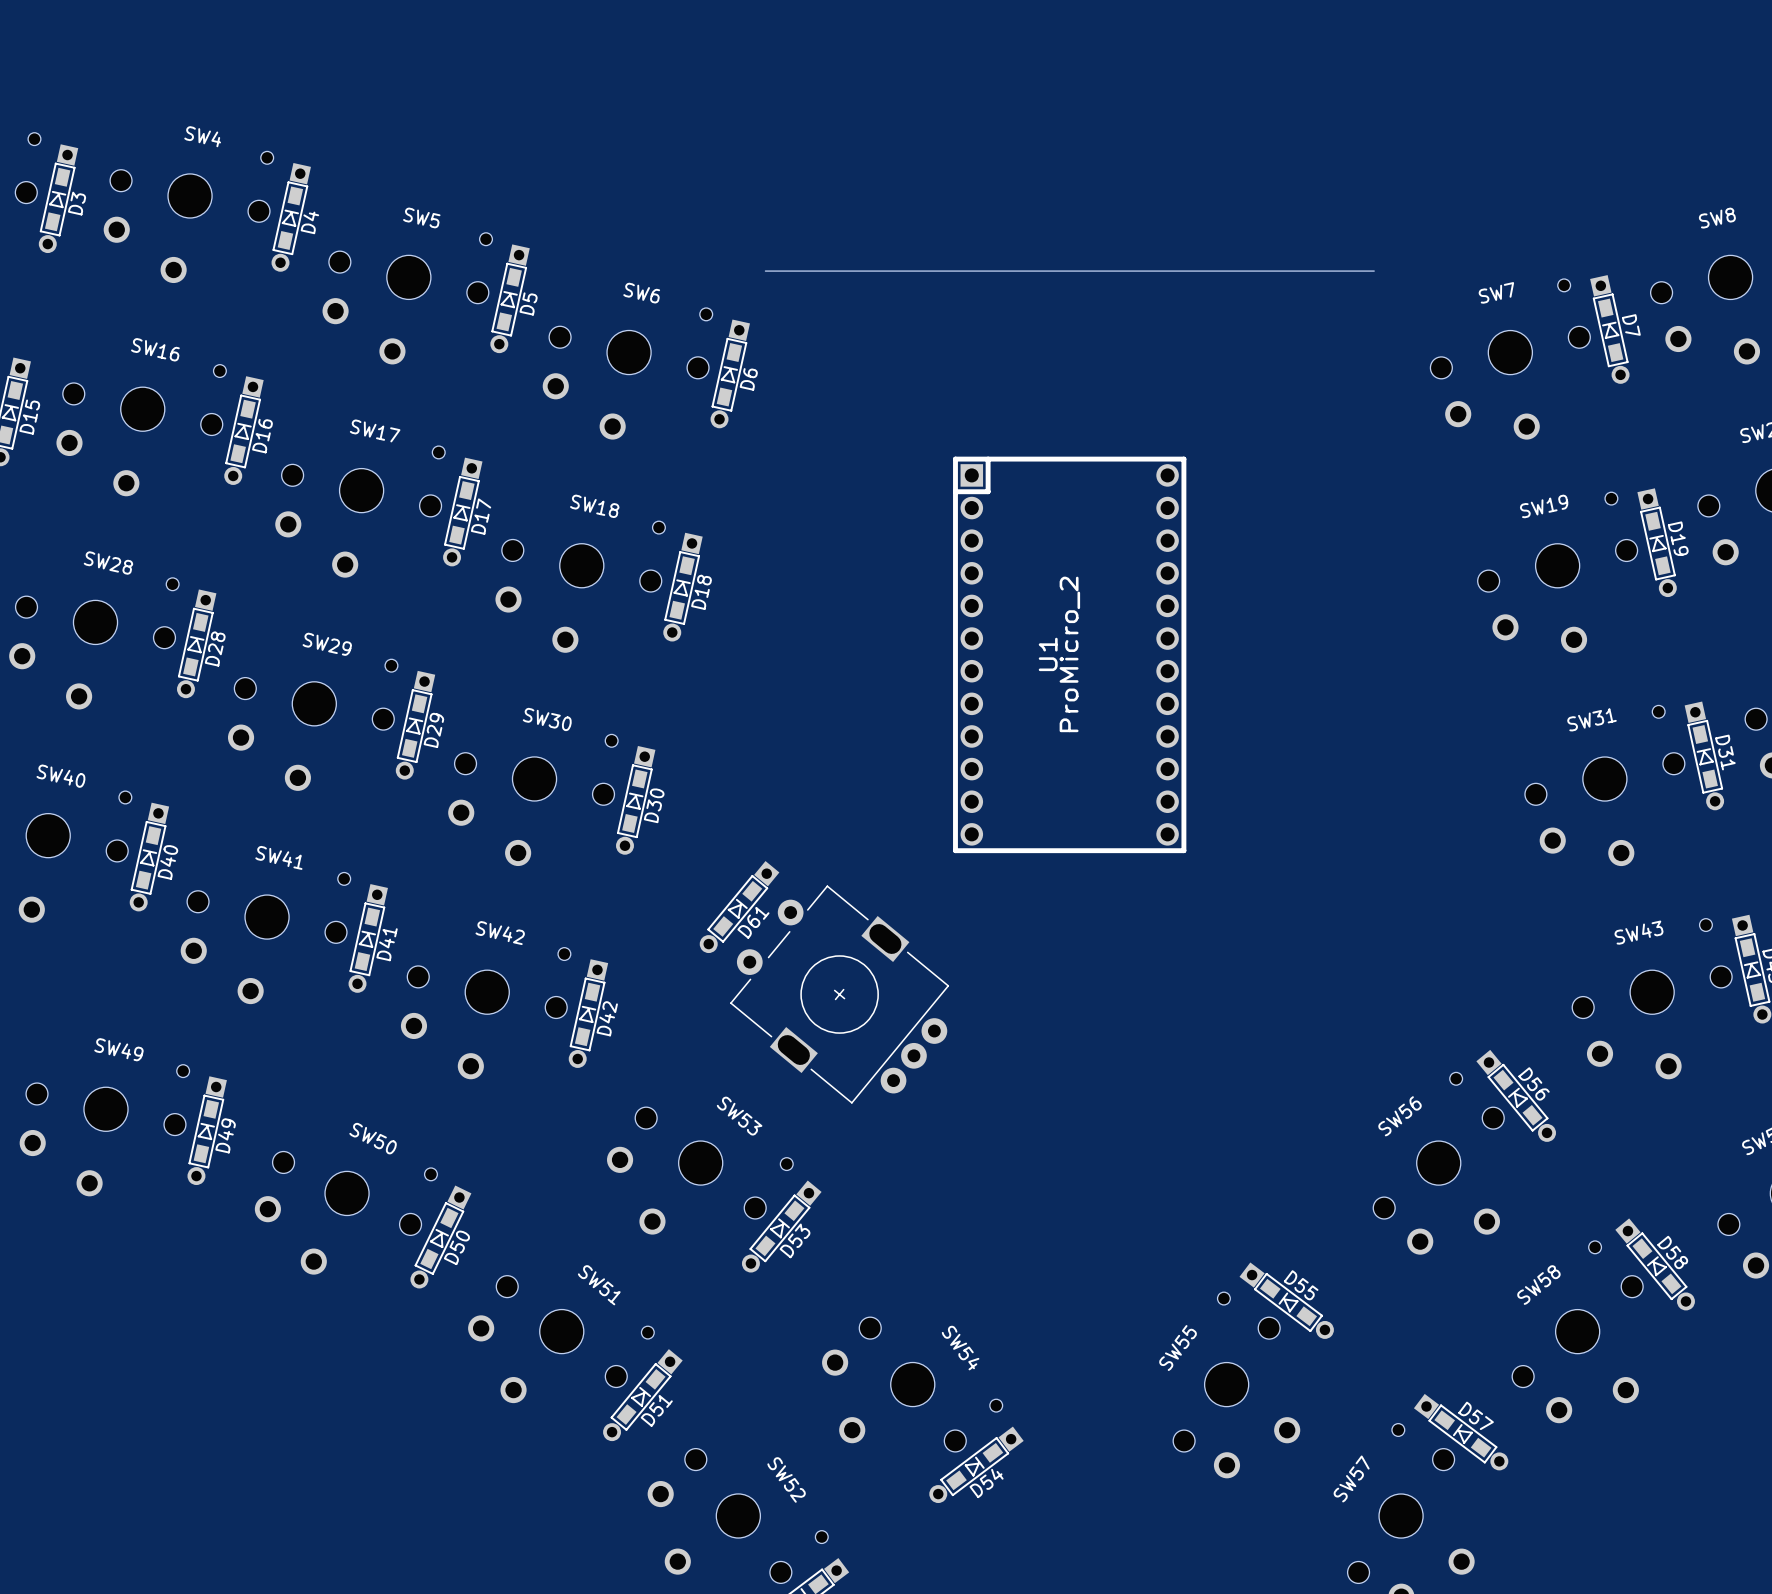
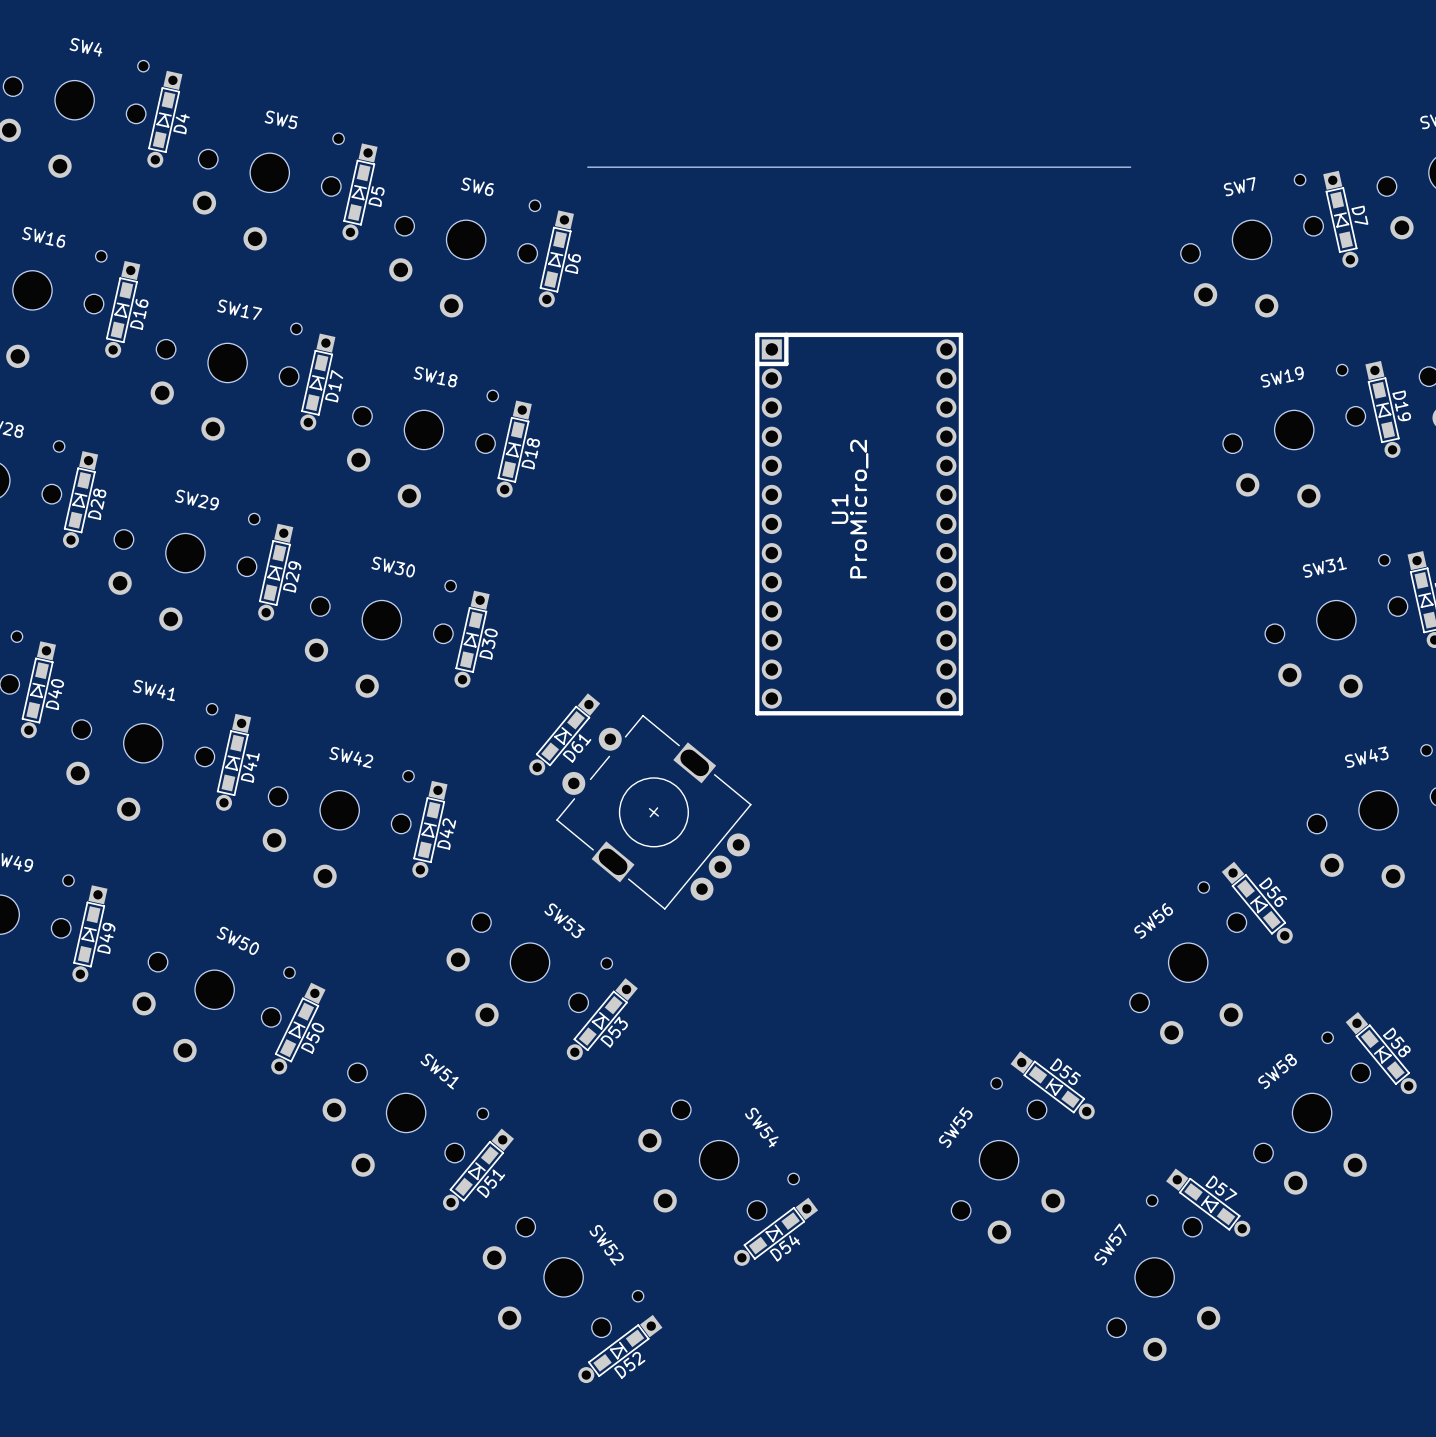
U1 footprint: [953, 456, 1187, 854] -> [755, 332, 964, 716]

